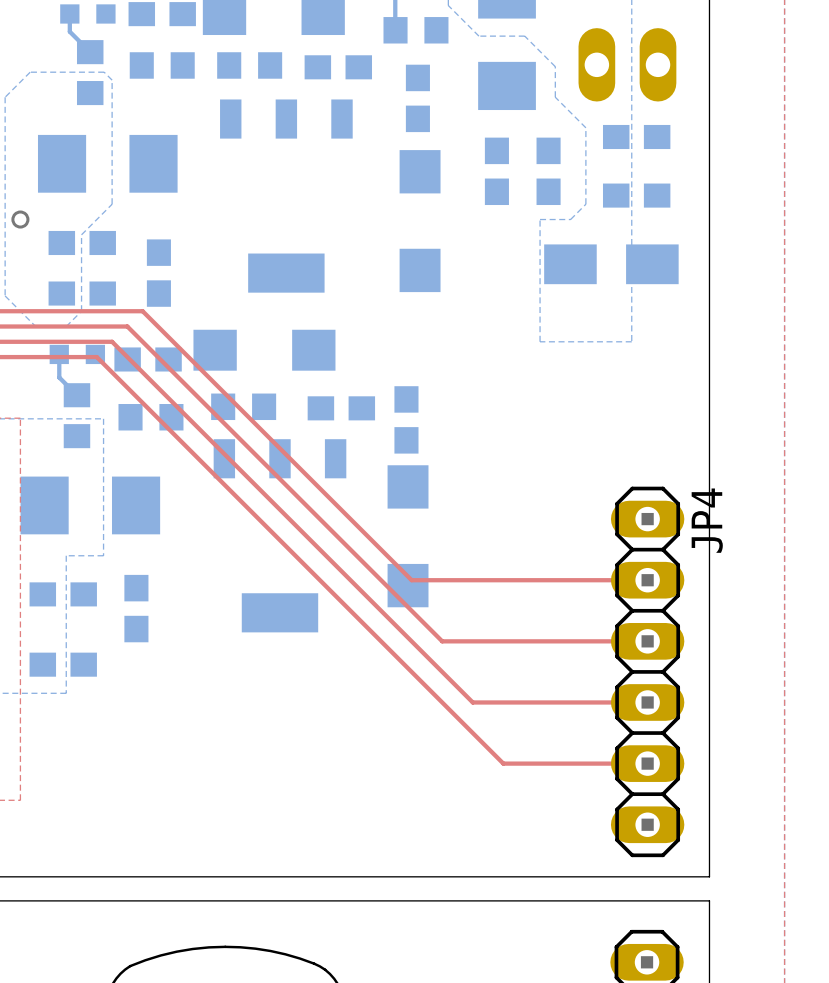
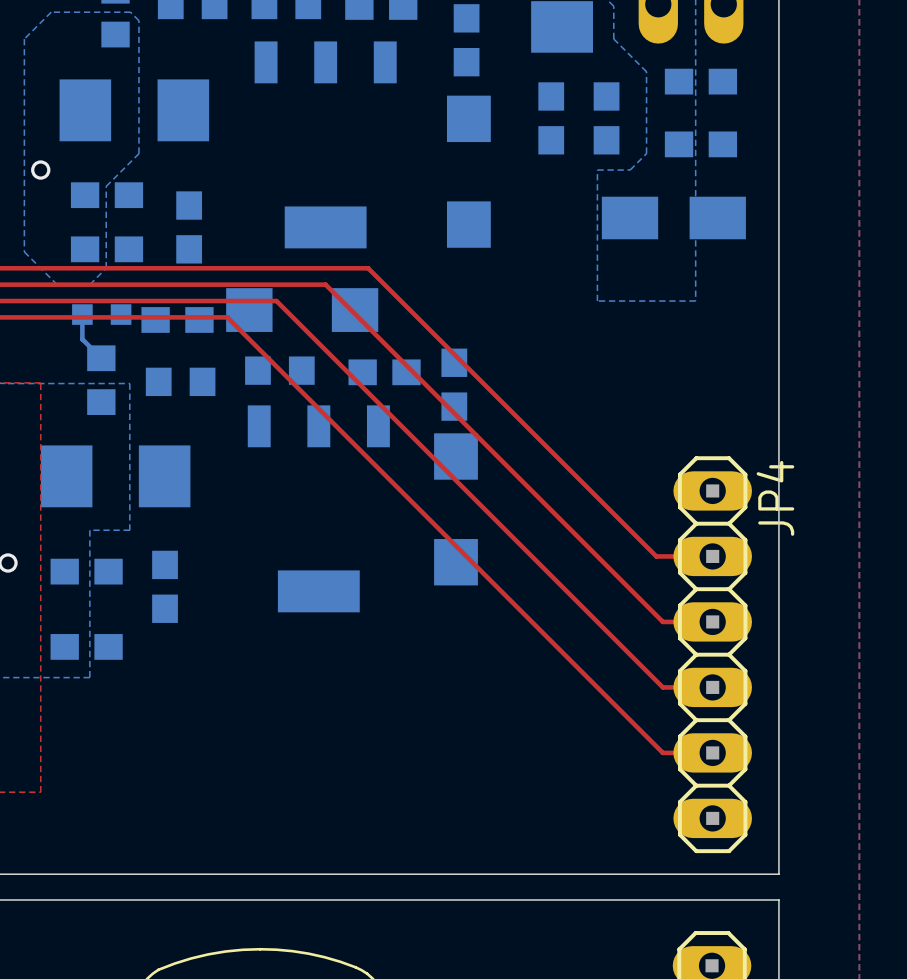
top track: (142, 311) (411, 580) (595, 580) -> (171, 268) (368, 268) (656, 556)
top track: (127, 326) (442, 641) (601, 641) -> (155, 284) (325, 284) (662, 621)
top track: (112, 341) (472, 702) (601, 702) -> (138, 301) (276, 301) (662, 687)
top track: (96, 357) (503, 763) (601, 763) -> (122, 317) (227, 317) (662, 752)

